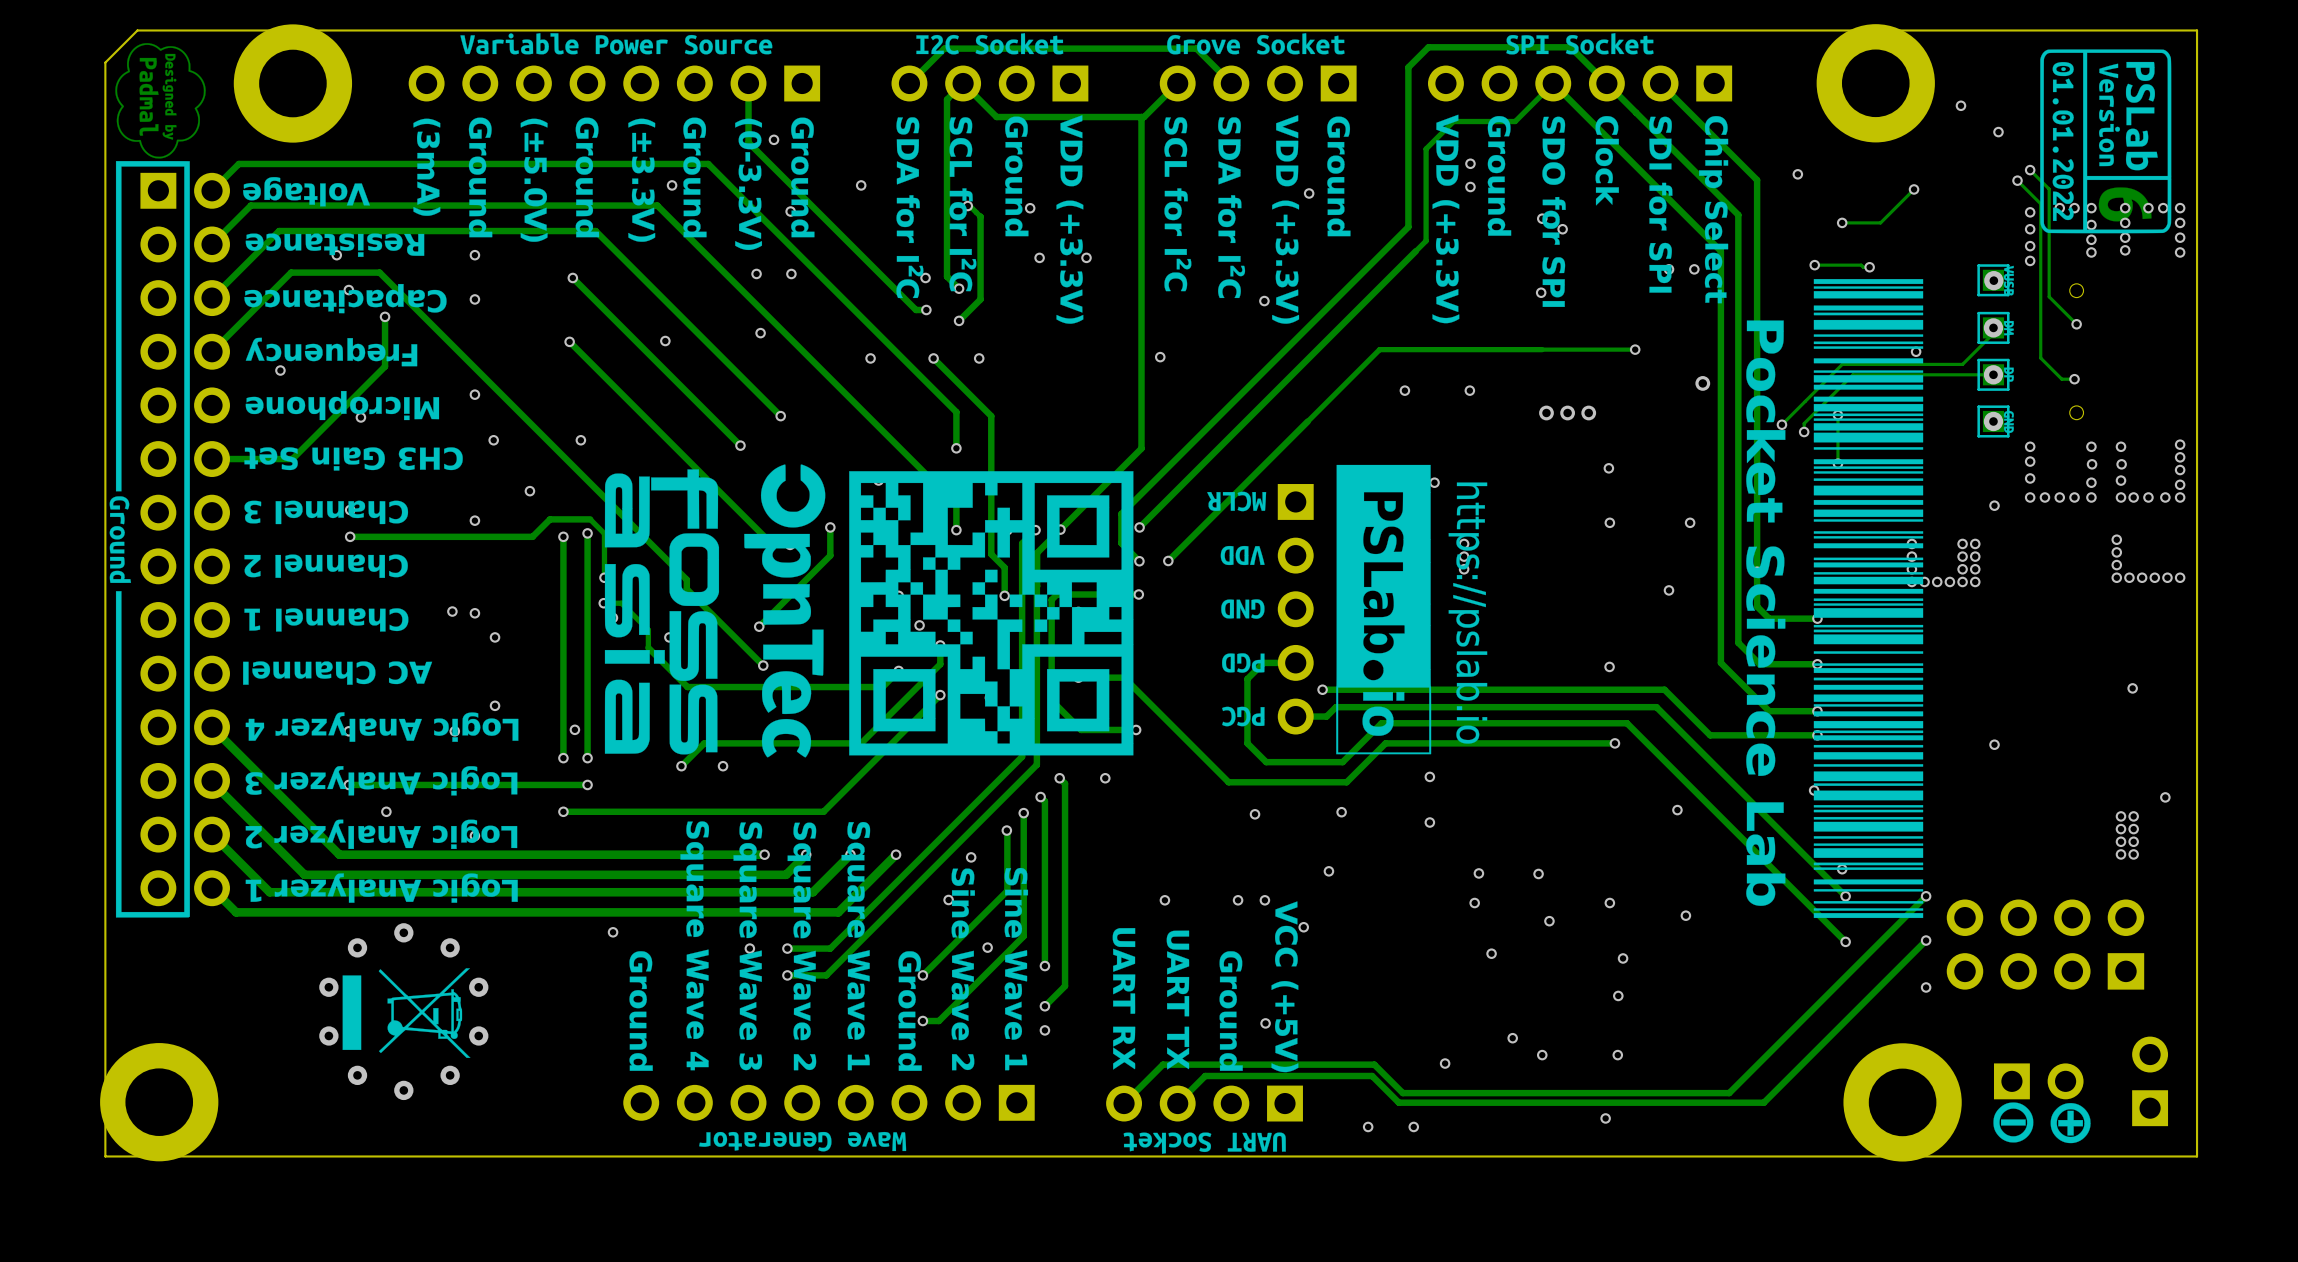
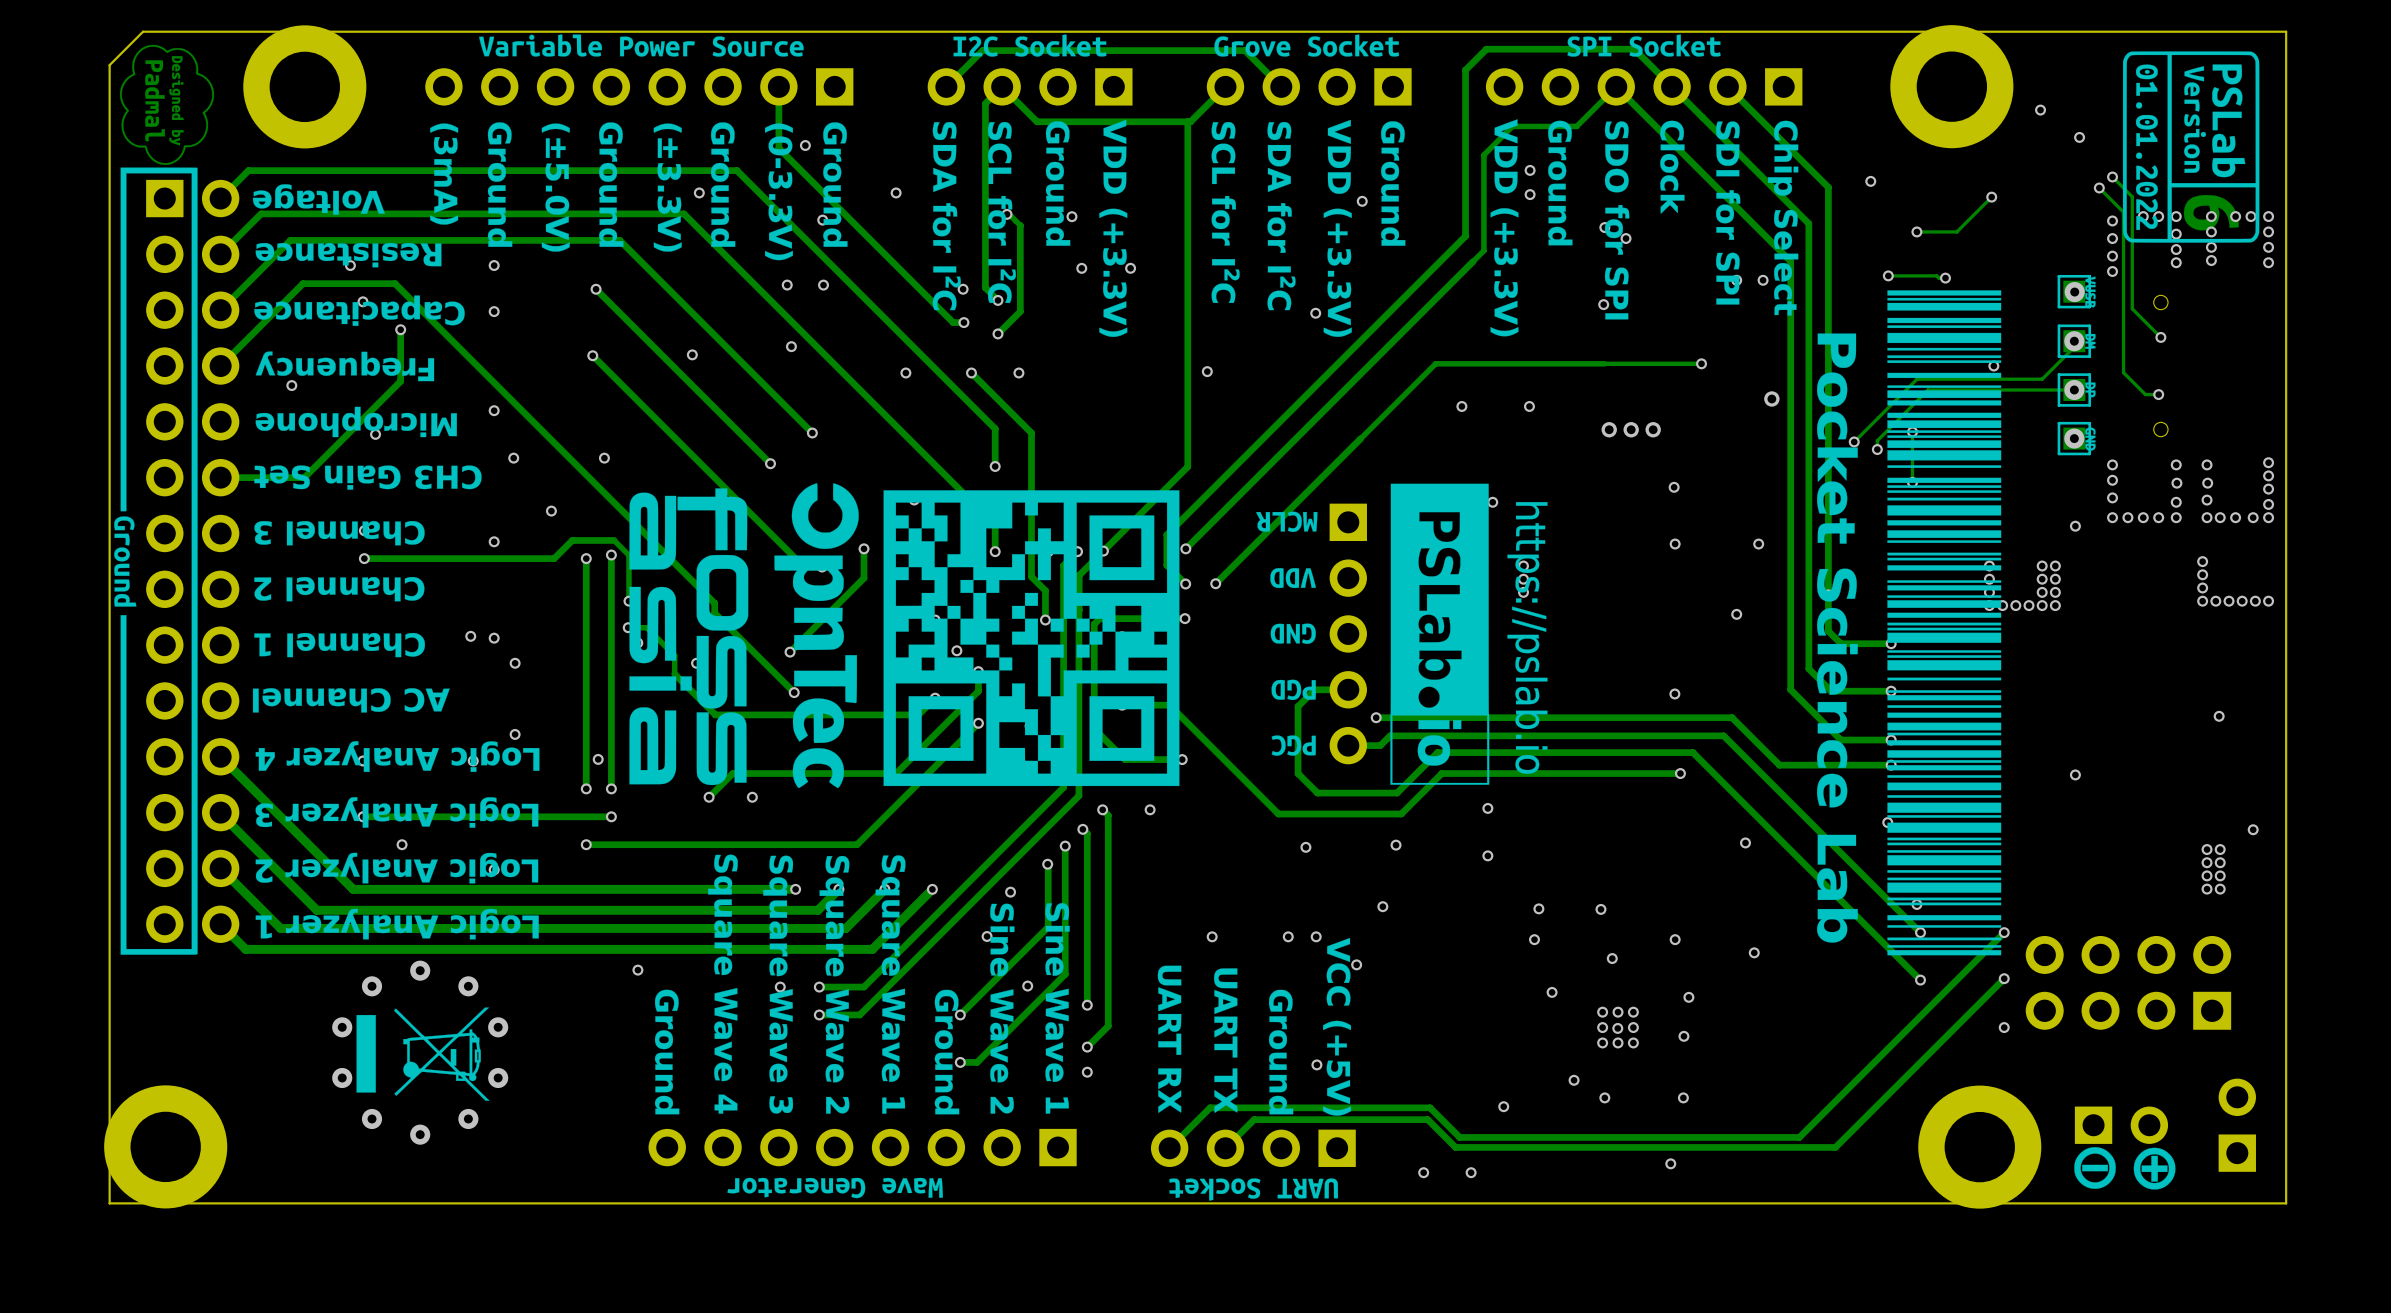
via: none -> (1602, 1012)
via: none -> (1618, 1012)
via: none -> (1633, 1012)
via: none -> (1602, 1027)
via: none -> (1633, 1027)
via: none -> (1617, 1028)
via: none -> (1602, 1042)
via: none -> (1618, 1042)
via: none -> (1633, 1042)

